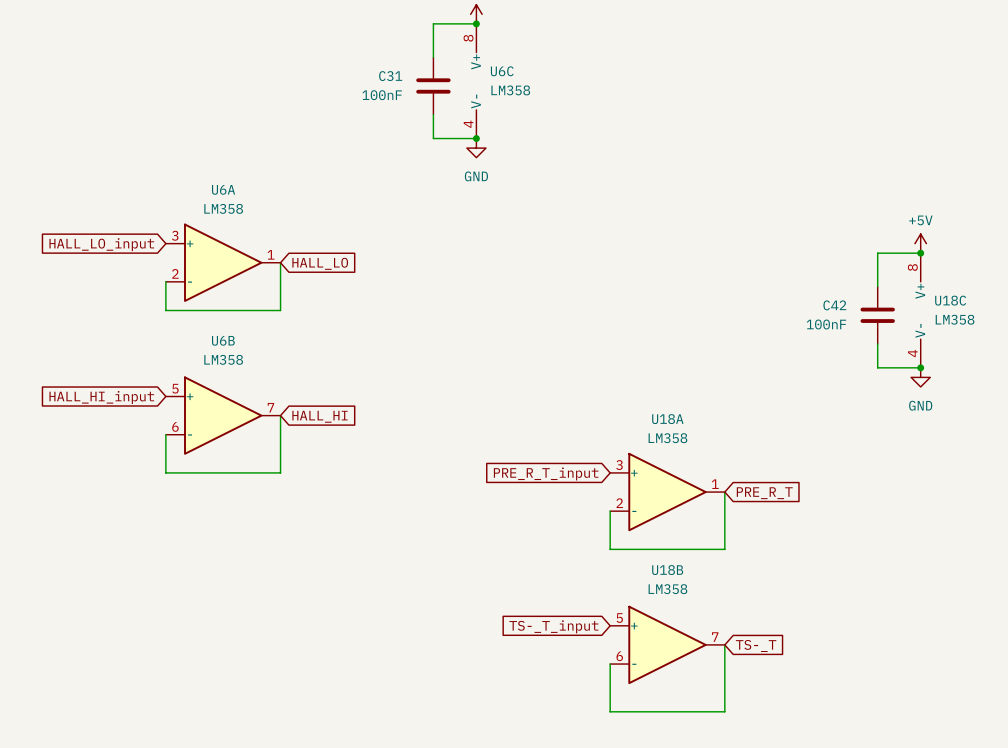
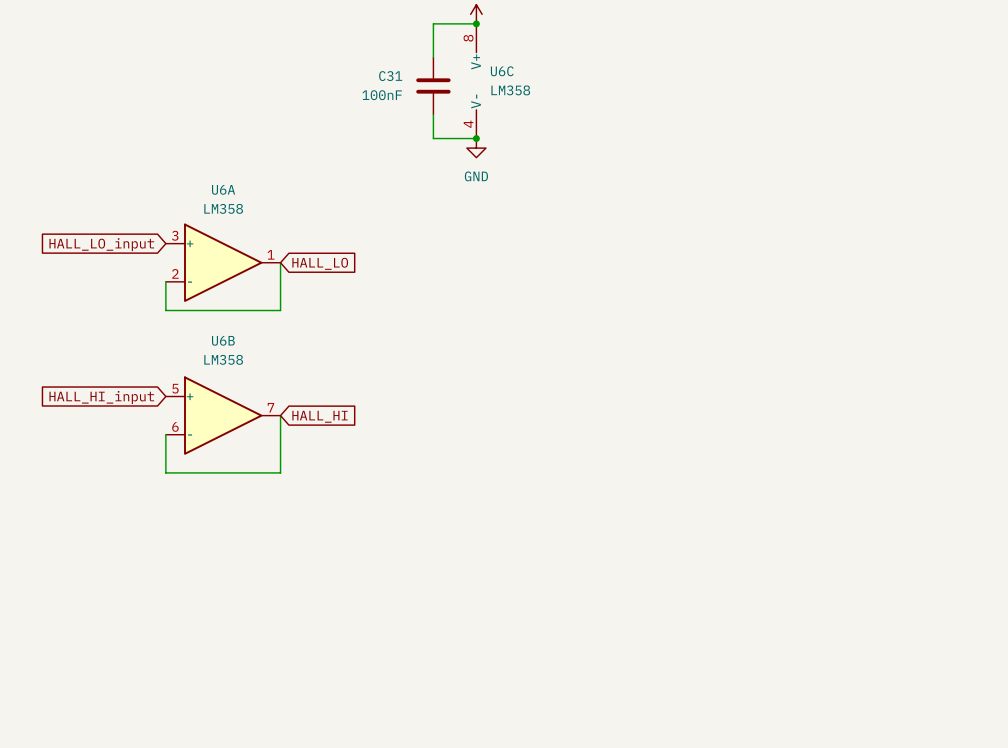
power symbol: +5V (920, 243) -> none
wire: (920, 253) (877, 253) (877, 286) -> none
junction: (920, 253) -> none
U18C: LM358 (920, 310) -> none
C42: 100nF (877, 315) -> none
wire: (877, 343) (877, 367) (920, 367) -> none
junction: (920, 367) -> none
power symbol: GND (920, 377) -> none
global label: PRE_R_T_input (546, 473) -> none
U18A: LM358 (667, 492) -> none
wire: (724, 492) (724, 549) (610, 549) (610, 511) -> none
global label: PRE_R_T (764, 493) -> none
global label: TS-_T_input (553, 626) -> none
U18B: LM358 (667, 644) -> none
wire: (724, 644) (724, 711) (610, 711) (610, 664) -> none
global label: TS-_T (756, 645) -> none

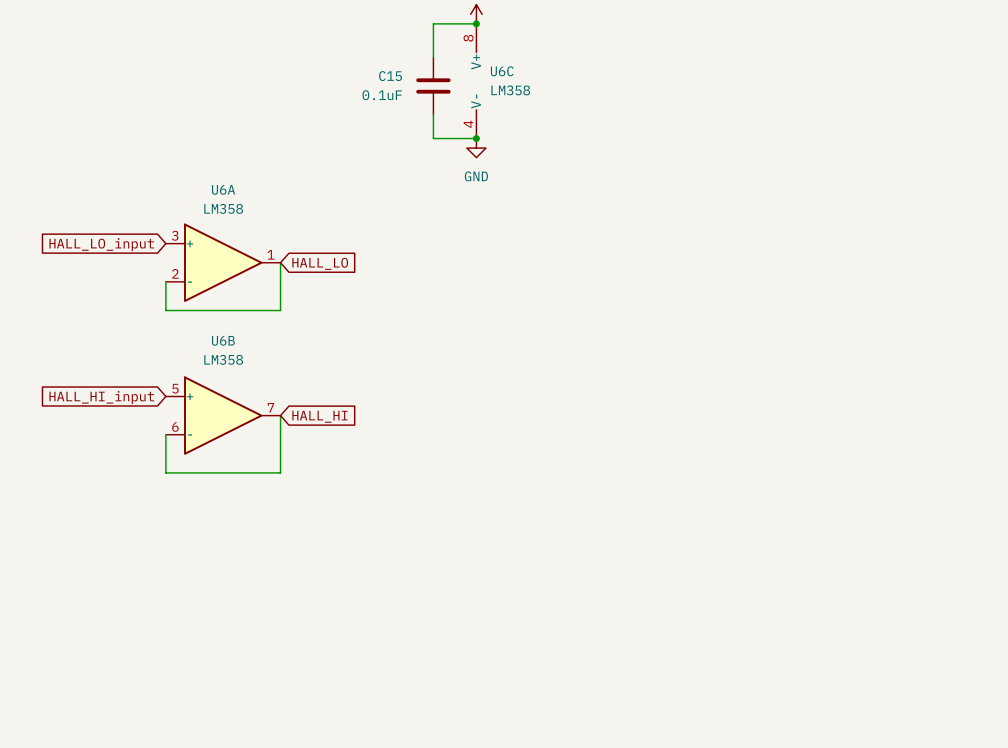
C31 name: C31 (390, 76) -> C15 (390, 76)
C31 value: 100nF (382, 95) -> 0.1uF (382, 95)

